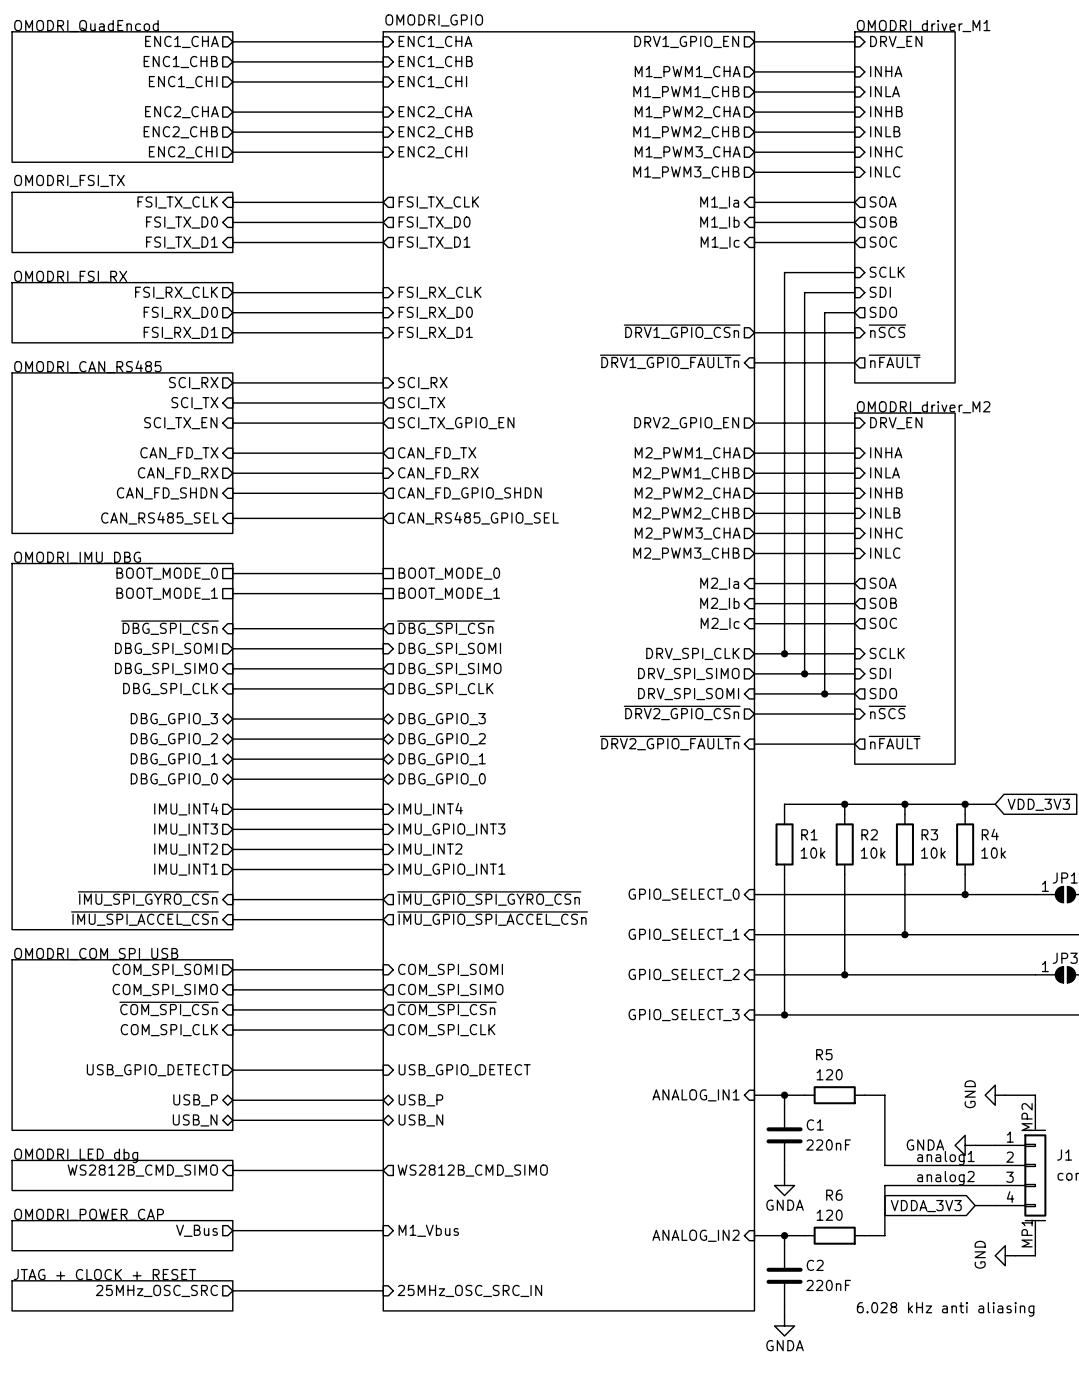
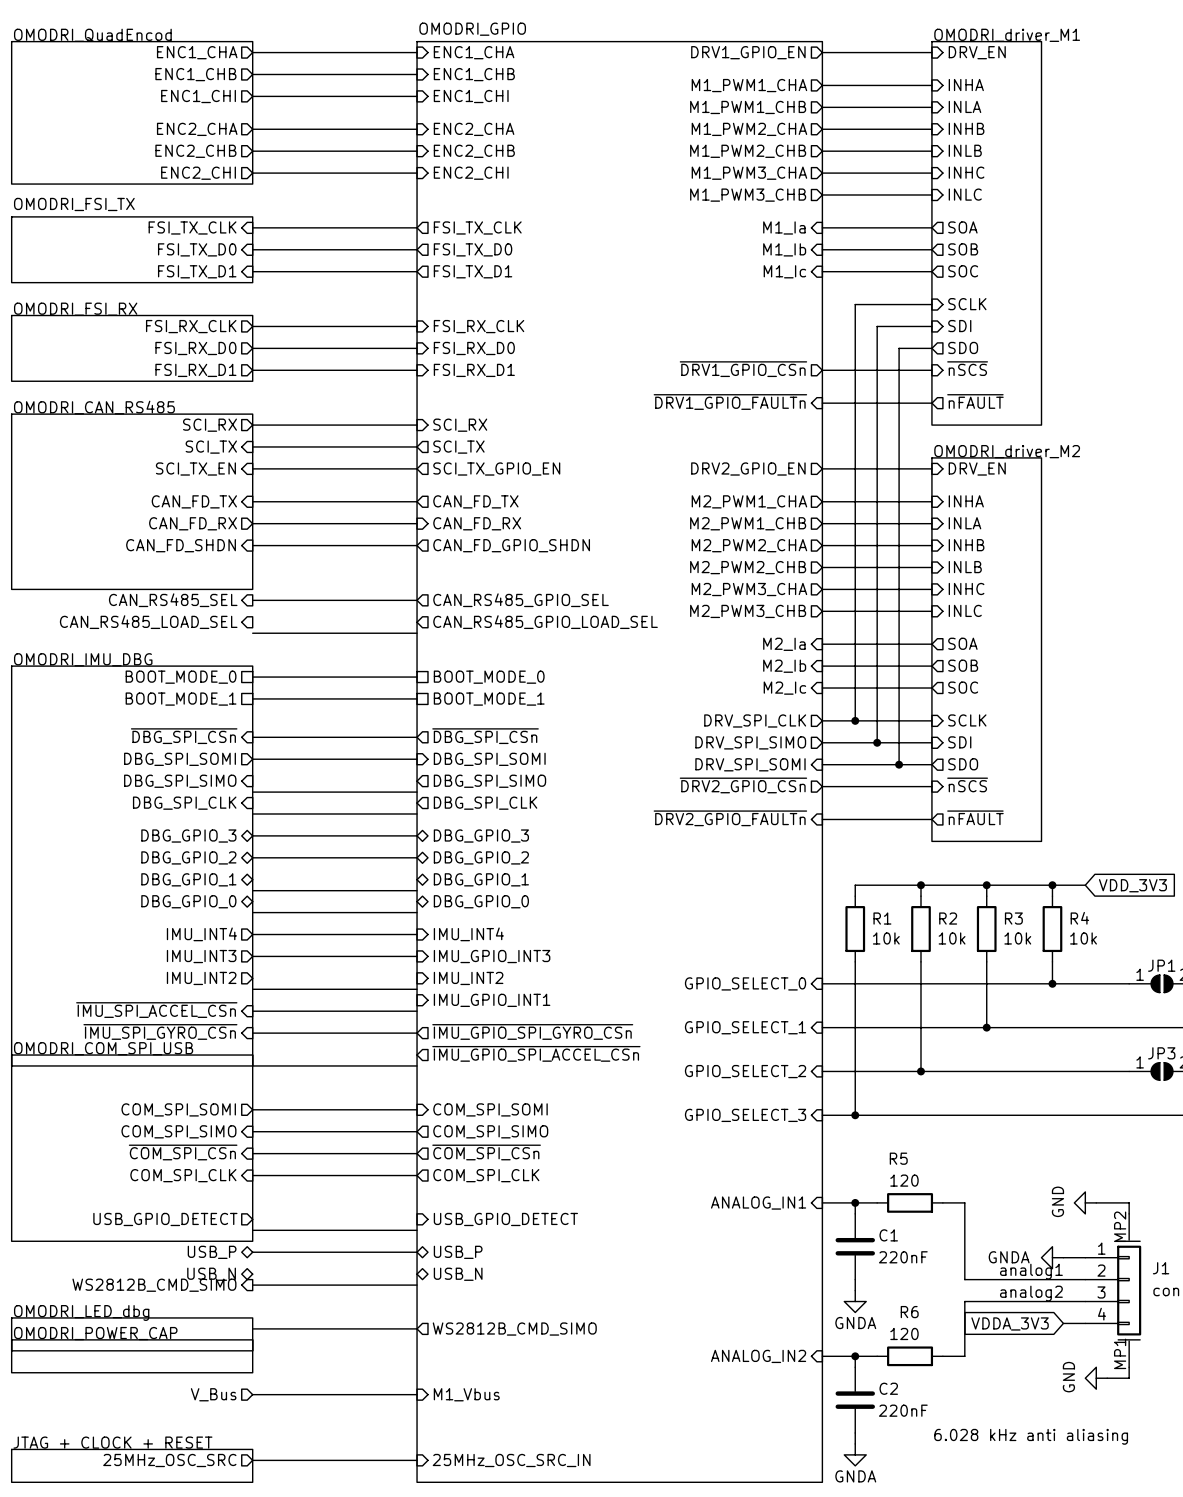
sheet pin position: CAN_RS485_SEL (160, 518) -> CAN_RS485_SEL (173, 600)
wire: (232, 518) (383, 518) -> (252, 600) (417, 600)
sheet pin position: CAN_RS485_GPIO_SEL (478, 518) -> CAN_RS485_GPIO_SEL (521, 600)
sheet pin: none -> CAN_RS485_LOAD_SEL (148, 622)
sheet pin: none -> CAN_RS485_GPIO_LOAD_SEL (545, 622)
sheet pin position: BOOT_MODE_0 (167, 573) -> BOOT_MODE_0 (181, 677)
sheet pin position: BOOT_MODE_0 (449, 573) -> BOOT_MODE_0 (489, 677)
sheet pin position: BOOT_MODE_1 (167, 593) -> BOOT_MODE_1 (181, 699)
wire: (232, 593) (383, 593) -> (252, 698) (417, 698)
sheet pin position: BOOT_MODE_1 (449, 593) -> BOOT_MODE_1 (489, 699)
sheet pin: ~{DBG_SPI_CSn} (170, 627) -> none
sheet pin: ~{DBG_SPI_CSn} (446, 627) -> none
wire: (232, 628) (383, 628) -> (252, 677) (417, 677)
sheet pin: DBG_SPI_SOMI (166, 648) -> none
wire: (232, 648) (383, 648) -> none
sheet pin: DBG_SPI_SOMI (449, 648) -> none
sheet pin: DBG_SPI_SIMO (166, 668) -> ~{DBG_SPI_CSn} (184, 736)
sheet pin: DBG_SPI_SIMO (450, 668) -> ~{DBG_SPI_CSn} (485, 736)
sheet OMODRI_GPIO: (568, 671) -> none
sheet pin shape: input (170, 689) -> output (180, 759)
sheet pin: DBG_SPI_CLK (170, 689) -> DBG_SPI_SOMI (180, 759)
sheet pin shape: output (446, 689) -> input (489, 759)
sheet pin: DBG_SPI_CLK (446, 689) -> DBG_SPI_SOMI (489, 759)
sheet OMODRI_GPIO: none -> (619, 761)
sheet pin: none -> DBG_SPI_SIMO (180, 781)
sheet pin: none -> DBG_SPI_SIMO (489, 781)
sheet pin: DBG_GPIO_3 (174, 719) -> none
sheet pin: DBG_GPIO_3 (442, 719) -> none
sheet pin: none -> DBG_SPI_CLK (184, 803)
sheet pin: none -> DBG_SPI_CLK (485, 803)
sheet pin: DBG_GPIO_2 (174, 739) -> none
sheet pin: DBG_GPIO_2 (442, 739) -> none
sheet OMODRI_IMU_DBG position: (122, 746) -> (132, 866)
sheet pin: DBG_GPIO_1 (174, 759) -> DBG_GPIO_3 (188, 836)
sheet pin: DBG_GPIO_1 (442, 759) -> DBG_GPIO_3 (481, 836)
sheet pin: DBG_GPIO_0 (174, 779) -> DBG_GPIO_2 (188, 857)
sheet pin: DBG_GPIO_0 (442, 779) -> DBG_GPIO_2 (481, 857)
sheet pin: none -> DBG_GPIO_1 (188, 879)
sheet pin: none -> DBG_GPIO_1 (481, 879)
sheet pin: IMU_INT4 (186, 809) -> none
sheet pin: IMU_INT4 (430, 809) -> none
sheet pin: none -> DBG_GPIO_0 (188, 901)
sheet pin: none -> DBG_GPIO_0 (481, 901)
sheet pin: IMU_INT3 (186, 829) -> none
sheet pin: IMU_GPIO_INT3 (451, 829) -> none
sheet pin: IMU_INT2 (186, 849) -> IMU_INT4 (201, 934)
sheet pin: IMU_INT2 (430, 849) -> IMU_INT4 (468, 934)
sheet pin: IMU_INT1 (186, 869) -> IMU_INT3 (201, 956)
sheet pin: IMU_GPIO_INT1 (451, 869) -> IMU_GPIO_INT3 (492, 956)
sheet pin: none -> IMU_INT2 (201, 978)
sheet pin: none -> IMU_INT2 (468, 978)
sheet pin position: ~{IMU_SPI_GYRO_CSn} (148, 898) -> ~{IMU_SPI_GYRO_CSn} (160, 1031)
sheet pin position: ~{IMU_GPIO_SPI_GYRO_CSn} (489, 898) -> ~{IMU_GPIO_SPI_GYRO_CSn} (532, 1031)
sheet pin: none -> IMU_GPIO_INT1 (492, 1000)
sheet pin position: ~{IMU_GPIO_SPI_ACCEL_CSn} (492, 918) -> ~{IMU_GPIO_SPI_ACCEL_CSn} (536, 1053)
sheet pin: COM_SPI_SOMI (165, 969) -> none
sheet pin: COM_SPI_SOMI (450, 969) -> none
sheet pin: COM_SPI_SIMO (165, 989) -> none
wire: (232, 989) (383, 989) -> (252, 1033) (417, 1033)
sheet pin: COM_SPI_SIMO (450, 989) -> none
sheet pin shape: input (169, 1008) -> output (178, 1109)
sheet pin: ~{COM_SPI_CSn} (169, 1008) -> COM_SPI_SOMI (178, 1109)
sheet pin shape: output (446, 1008) -> input (490, 1109)
sheet pin: ~{COM_SPI_CSn} (446, 1008) -> COM_SPI_SOMI (490, 1109)
sheet pin: COM_SPI_CLK (169, 1030) -> COM_SPI_SIMO (178, 1131)
sheet pin: COM_SPI_CLK (446, 1030) -> COM_SPI_SIMO (490, 1131)
sheet pin: none -> ~{COM_SPI_CSn} (183, 1152)
sheet pin: none -> ~{COM_SPI_CSn} (486, 1152)
wire: none -> (252, 1153) (417, 1153)
sheet pin shape: output (152, 1070) -> input (183, 1175)
sheet pin: USB_GPIO_DETECT (152, 1070) -> COM_SPI_CLK (183, 1175)
sheet pin shape: input (464, 1070) -> output (486, 1175)
sheet pin: USB_GPIO_DETECT (464, 1070) -> COM_SPI_CLK (486, 1175)
sheet pin position: USB_P (195, 1100) -> USB_P (212, 1252)
wire: (232, 1100) (383, 1100) -> (252, 1252) (417, 1252)
sheet pin position: USB_P (420, 1100) -> USB_P (458, 1252)
sheet pin: none -> USB_GPIO_DETECT (165, 1219)
sheet pin: none -> USB_GPIO_DETECT (505, 1219)
sheet pin position: USB_N (195, 1120) -> USB_N (211, 1274)
sheet pin position: USB_N (420, 1120) -> USB_N (458, 1274)
sheet pin position: WS2812B_CMD_SIMO (472, 1170) -> WS2812B_CMD_SIMO (514, 1329)
sheet OMODRI_LED_dbg position: (122, 1175) -> (132, 1334)
wire: none -> (252, 1328) (417, 1328)
sheet pin position: V_Bus (197, 1230) -> V_Bus (213, 1394)
wire: (232, 1230) (383, 1230) -> (252, 1394) (417, 1394)
sheet pin position: M1_Vbus (428, 1230) -> M1_Vbus (466, 1394)
sheet pin position: 25MHz_OSC_SRC (156, 1290) -> 25MHz_OSC_SRC (169, 1460)
wire: (232, 1290) (383, 1290) -> (252, 1460) (417, 1460)
sheet pin position: 25MHz_OSC_SRC_IN (469, 1290) -> 25MHz_OSC_SRC_IN (511, 1460)
sheet JTAG + CLOCK + RESET position: (122, 1295) -> (132, 1465)

